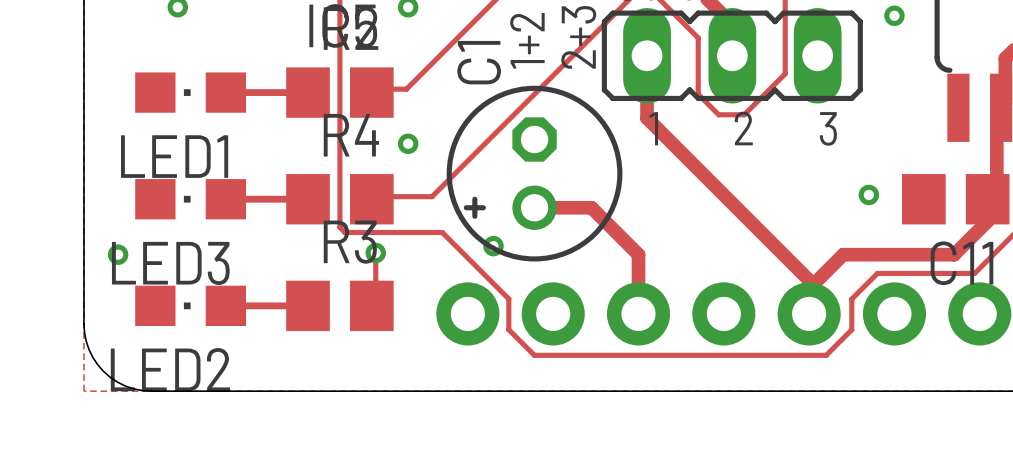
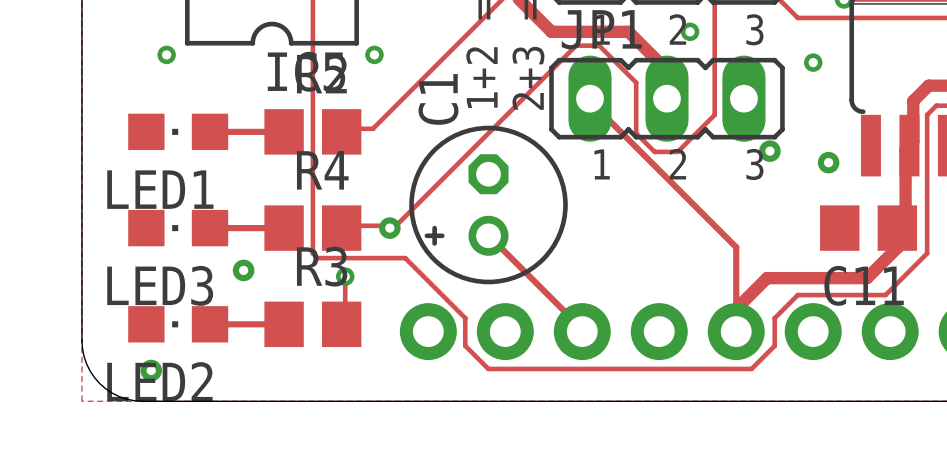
track: (647, 55) (647, 118) (813, 284) -> (590, 98) (591, 103) (736, 247) (736, 308)
via: none -> (769, 151)
via: none -> (828, 162)
via: (408, 143) -> none
via: (868, 194) -> none
via: none -> (389, 228)
track: (534, 207) (591, 207) (638, 254) (638, 311) -> (488, 235) (582, 329)
via: none -> (243, 270)
via: (493, 246) -> none
via: (118, 254) -> none
via: none -> (151, 370)

